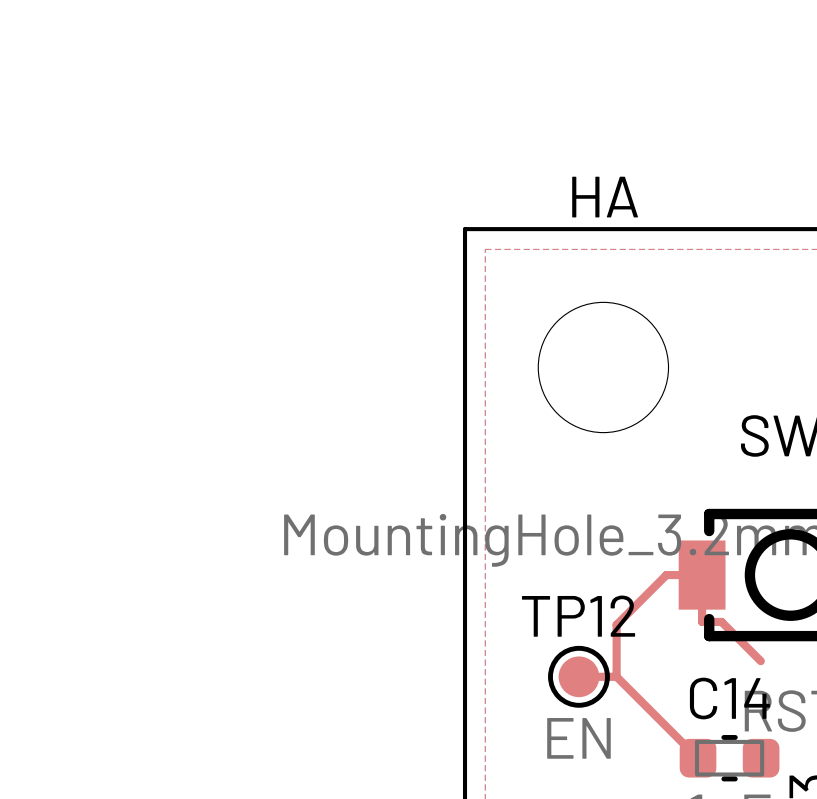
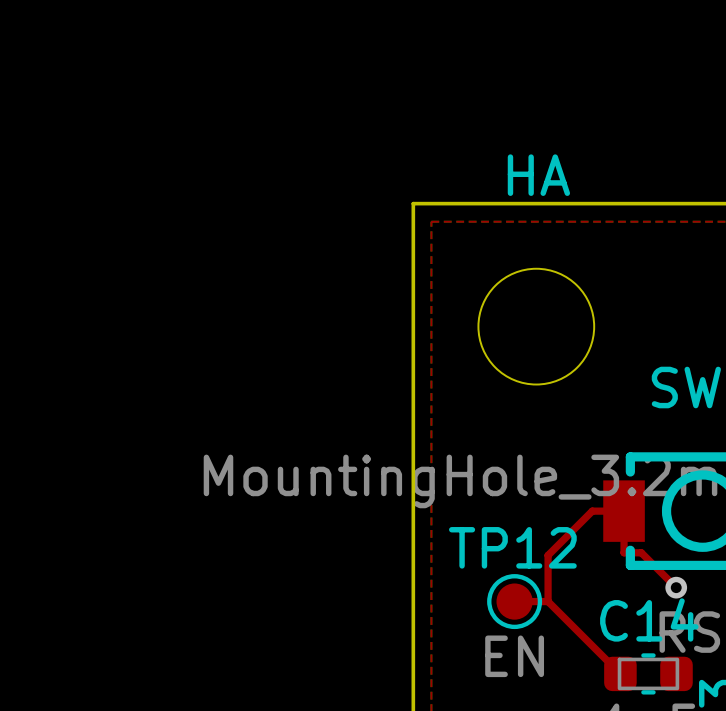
via: none -> (676, 587)

